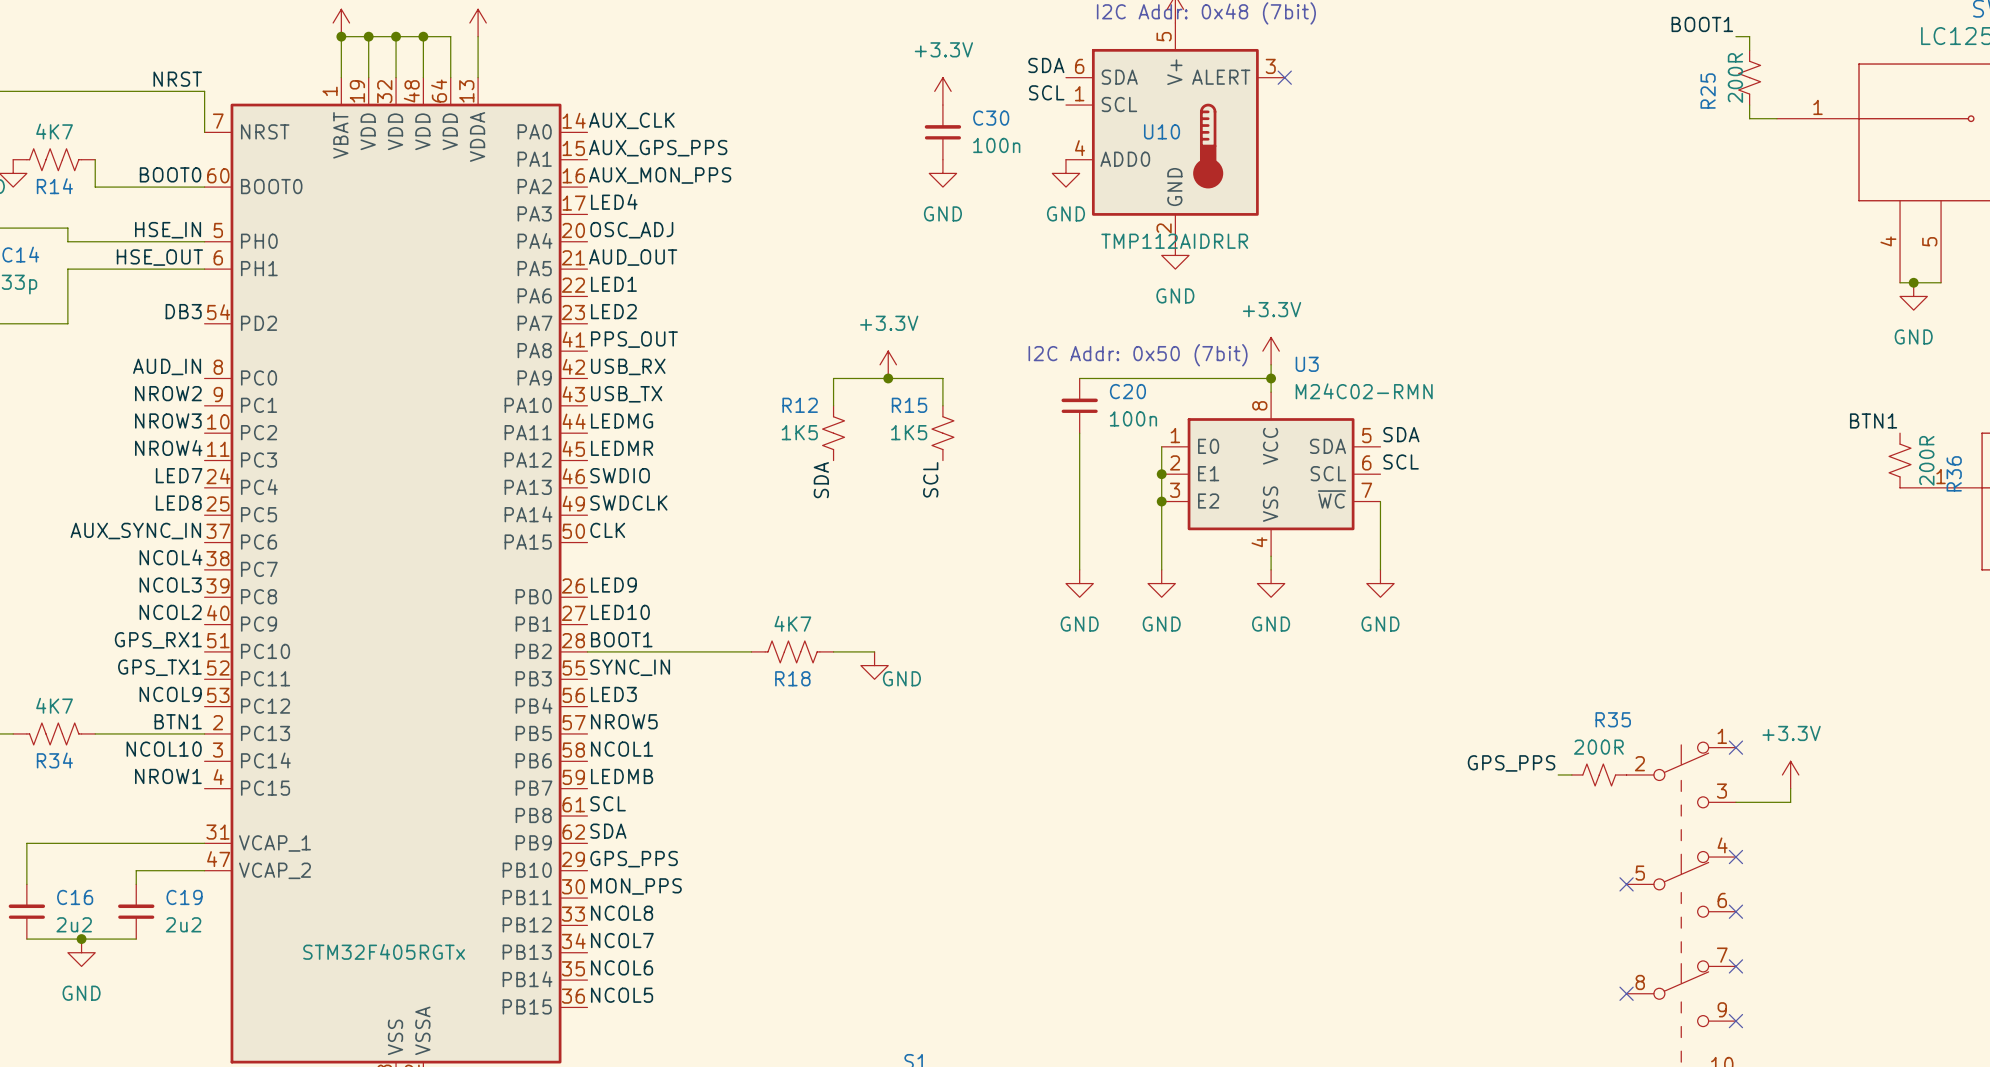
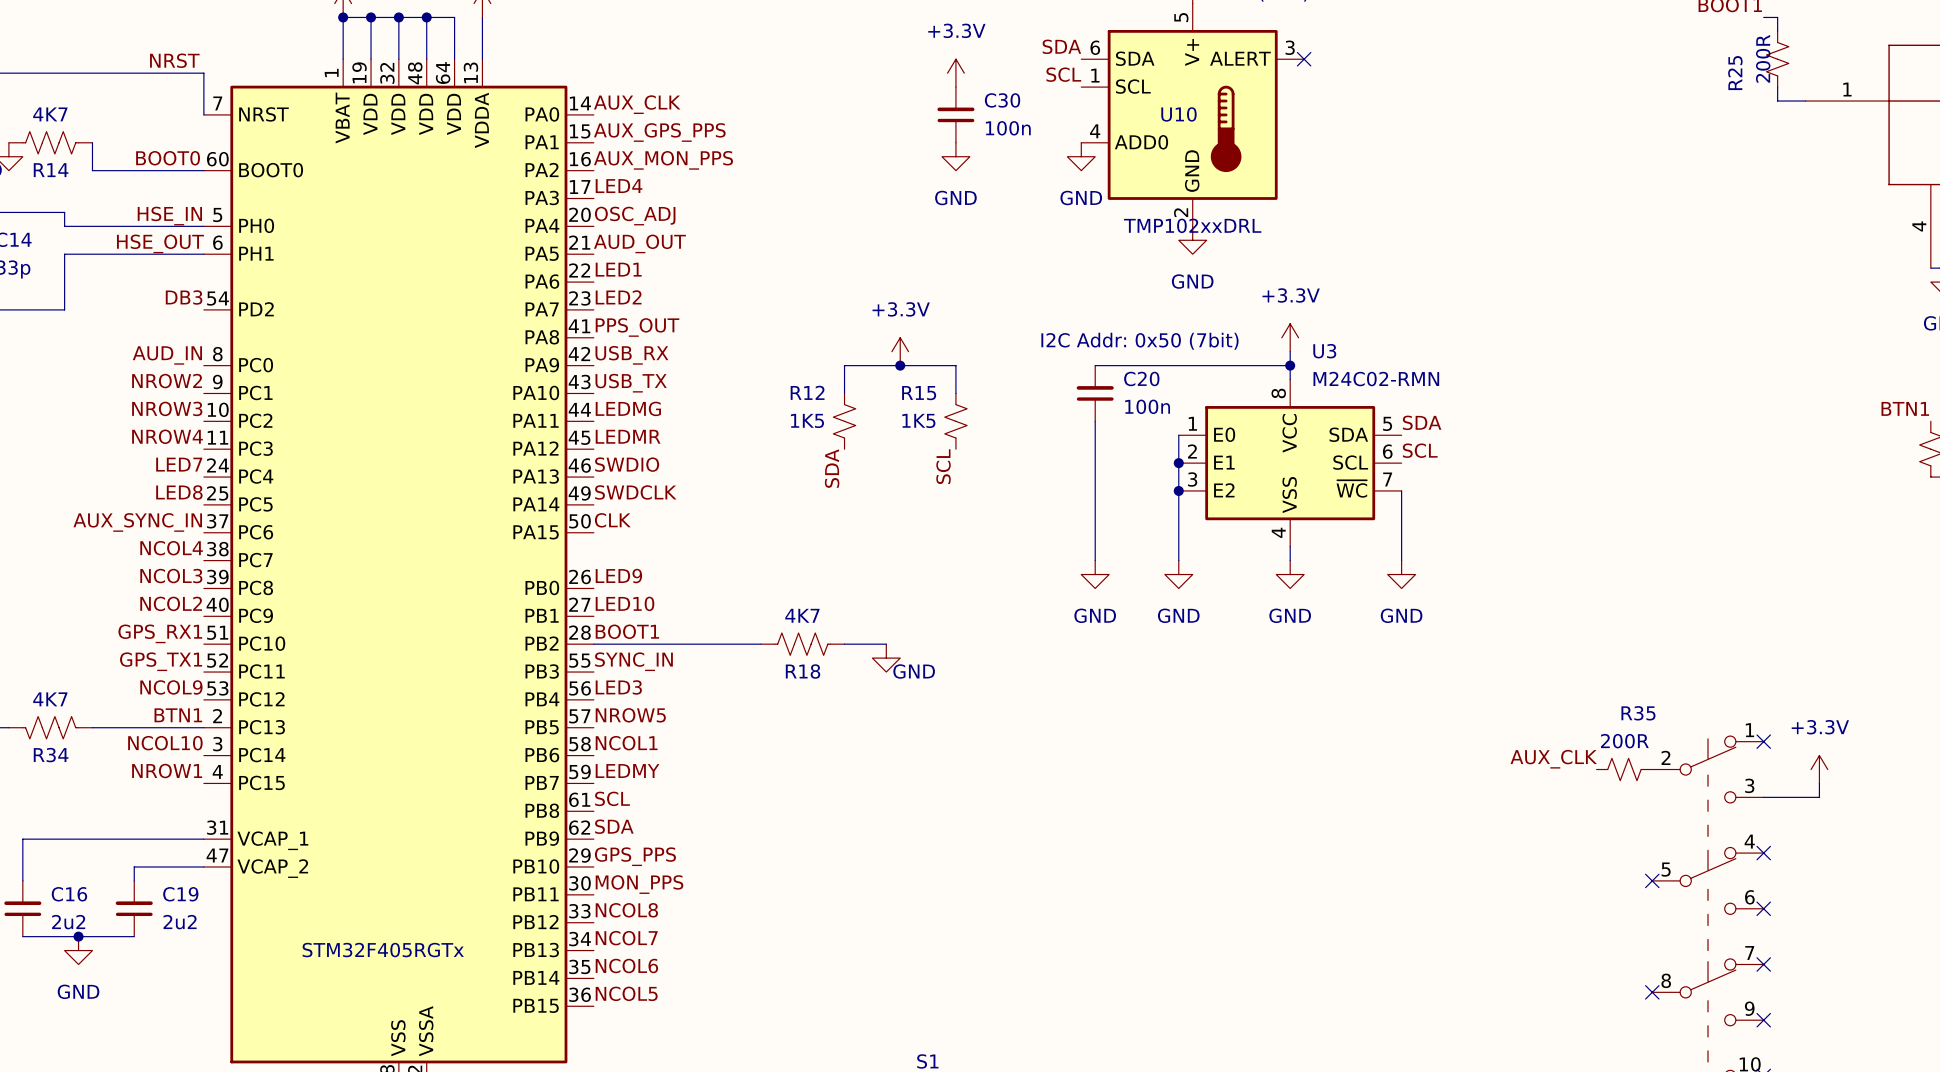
U10 value: TMP112AIDRLR (1174, 241) -> TMP102xxDRL (1192, 225)
label: GPS_PPS (1511, 763) -> none
label: none -> AUX_CLK (1553, 759)
wire: (1558, 774) (1571, 774) -> none
label: LEDMB (622, 776) -> LEDMY (627, 771)

